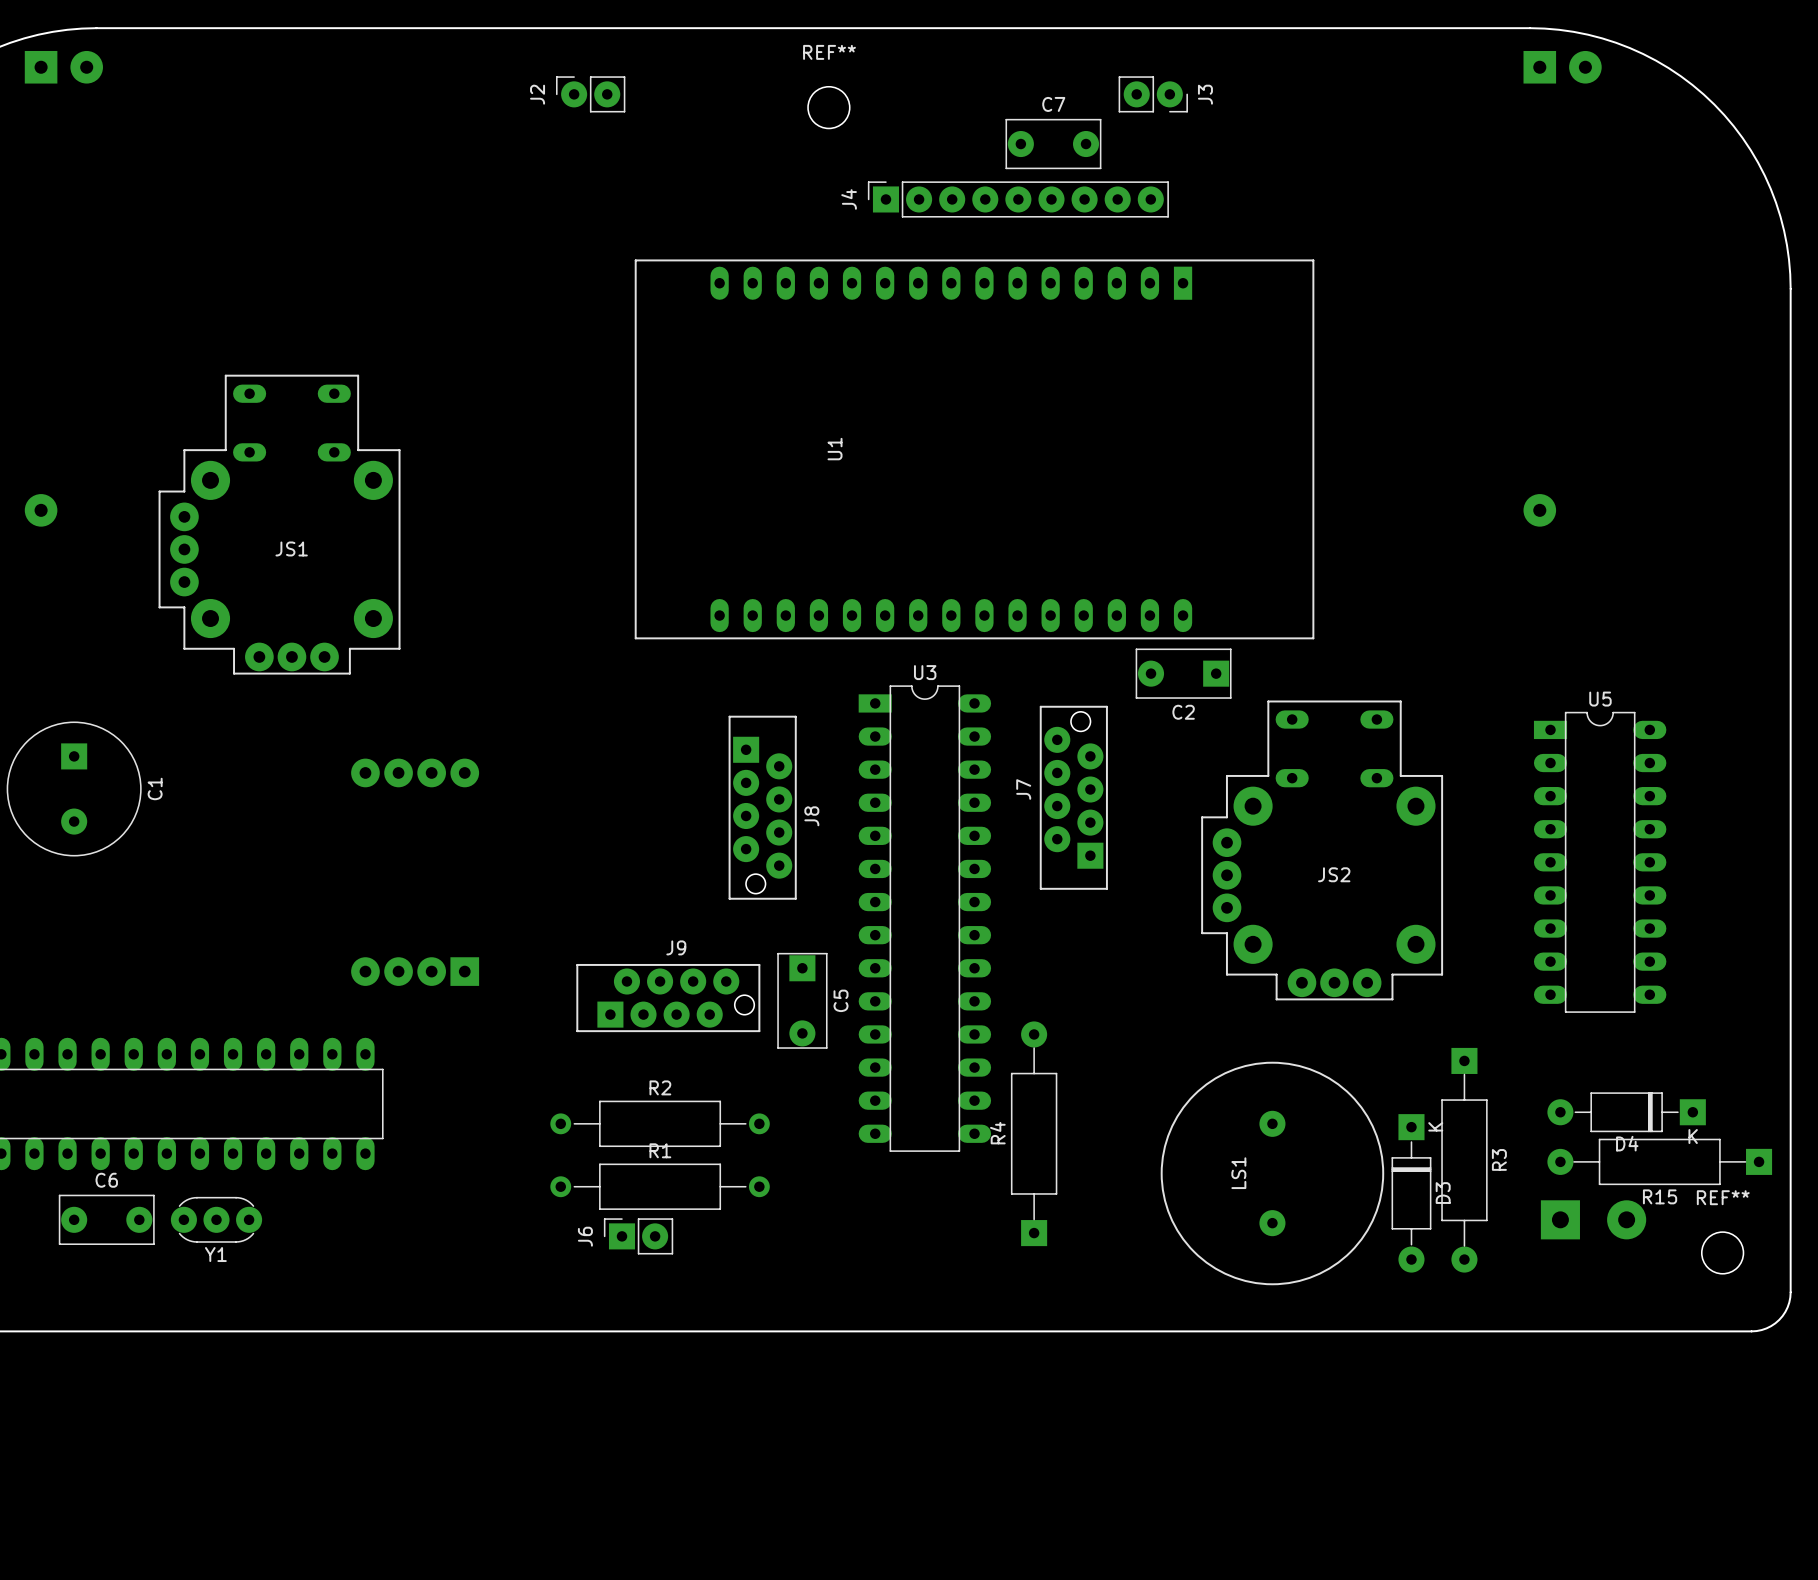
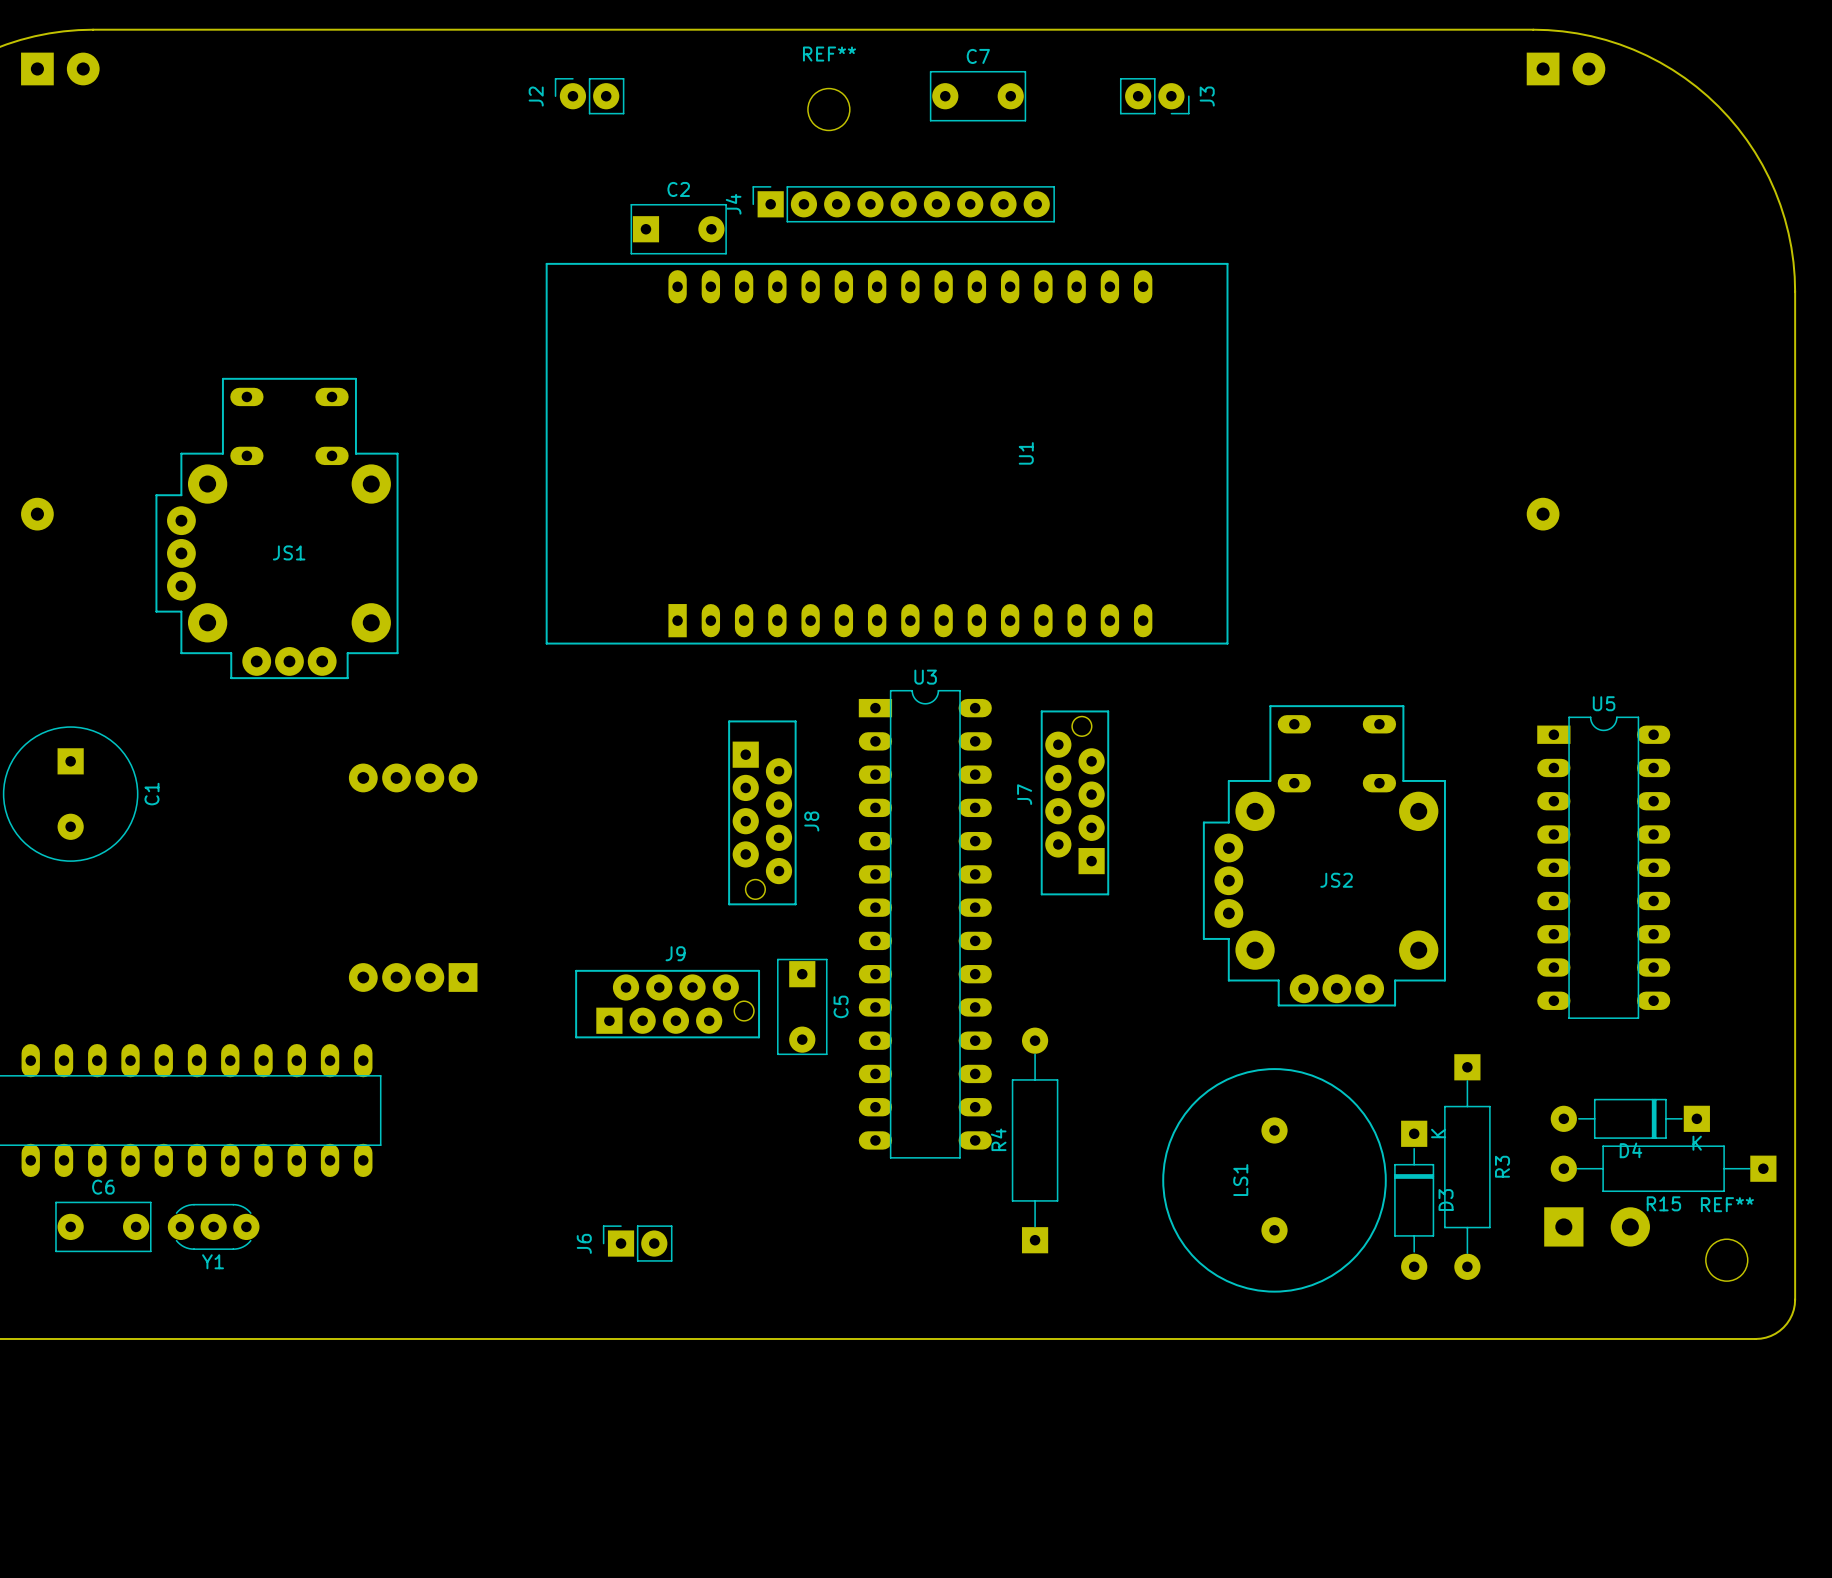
C7 position: (1053, 144) -> (978, 96)
J4 position: (1018, 199) -> (903, 204)
U1 rotation: 0° (974, 449) -> 180° (887, 453)
C2 rotation: 0° (1183, 673) -> 180° (678, 229)
C2 position: (1183, 673) -> (678, 229)
R2: (660, 1123) -> none
R1: (660, 1186) -> none

